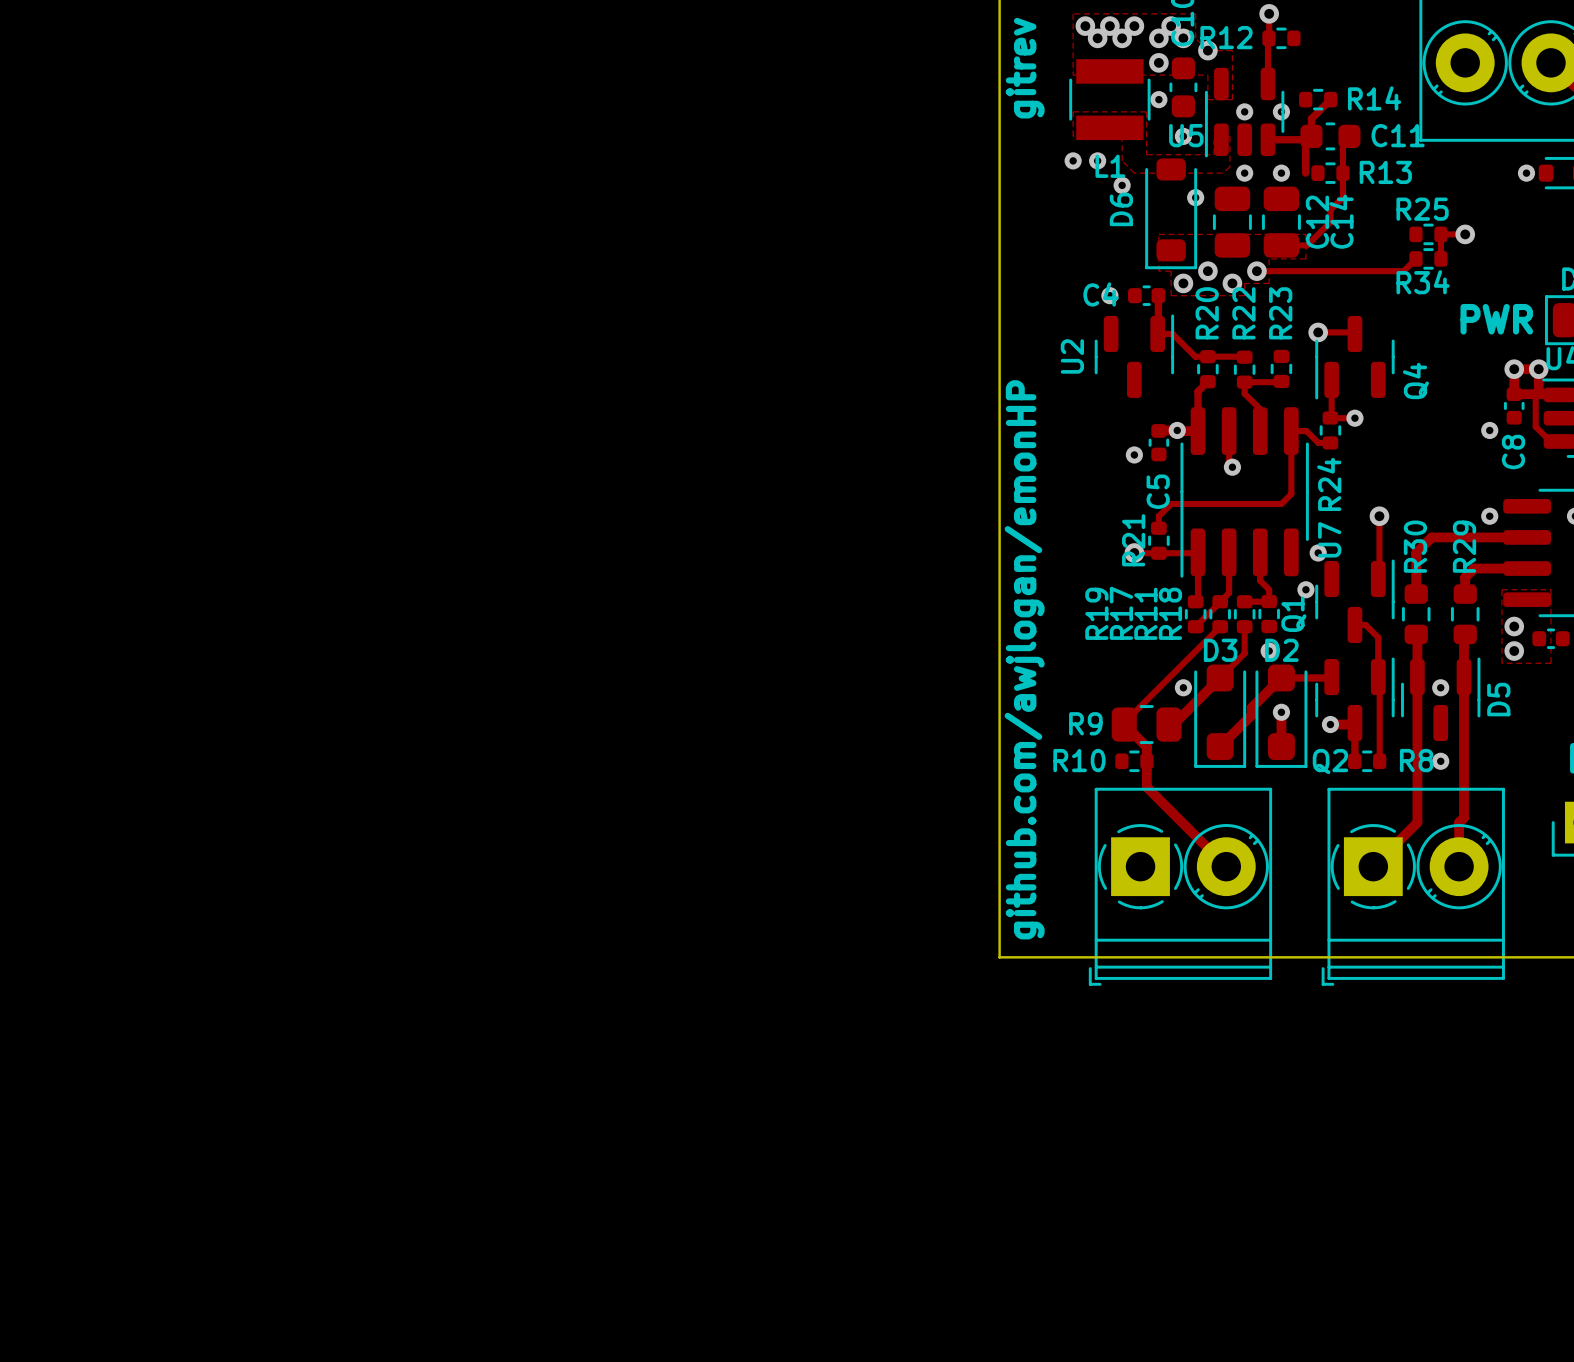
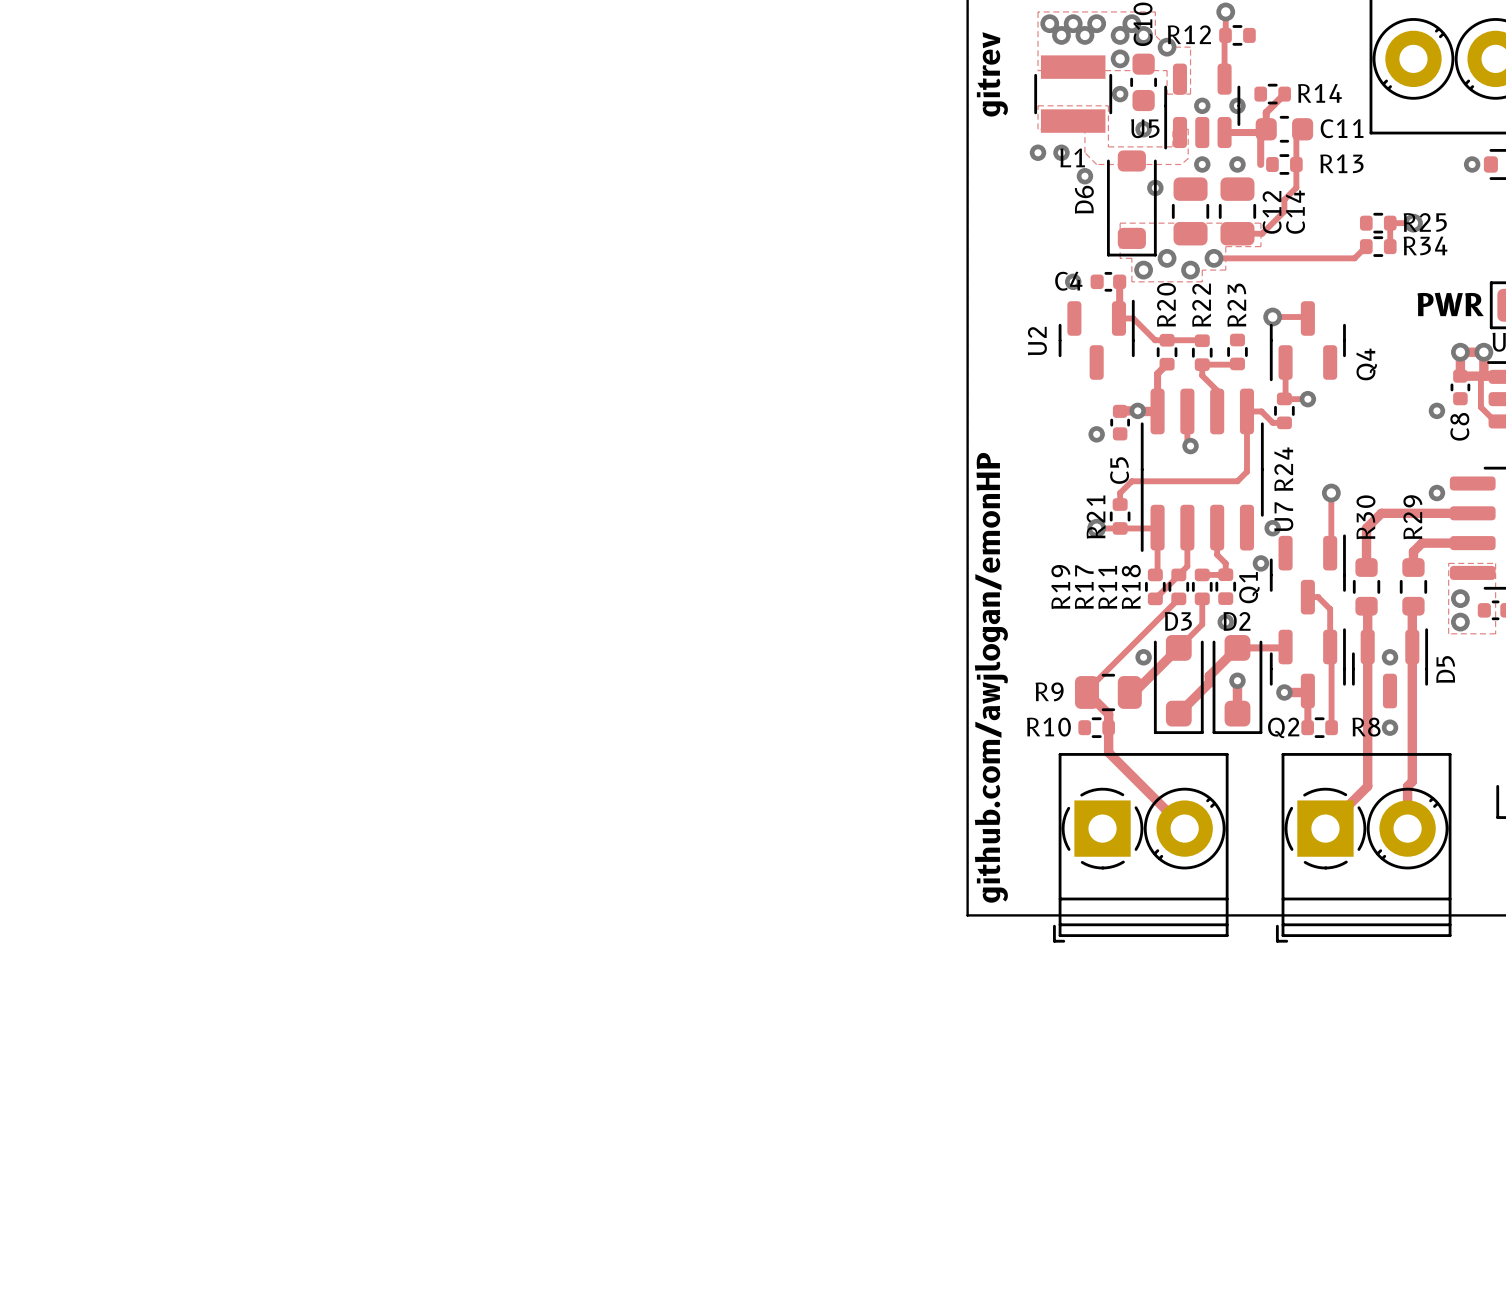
R25 name position: R25 (1422, 209) -> R25 (1425, 222)
R34 name position: R34 (1423, 282) -> R34 (1425, 245)

